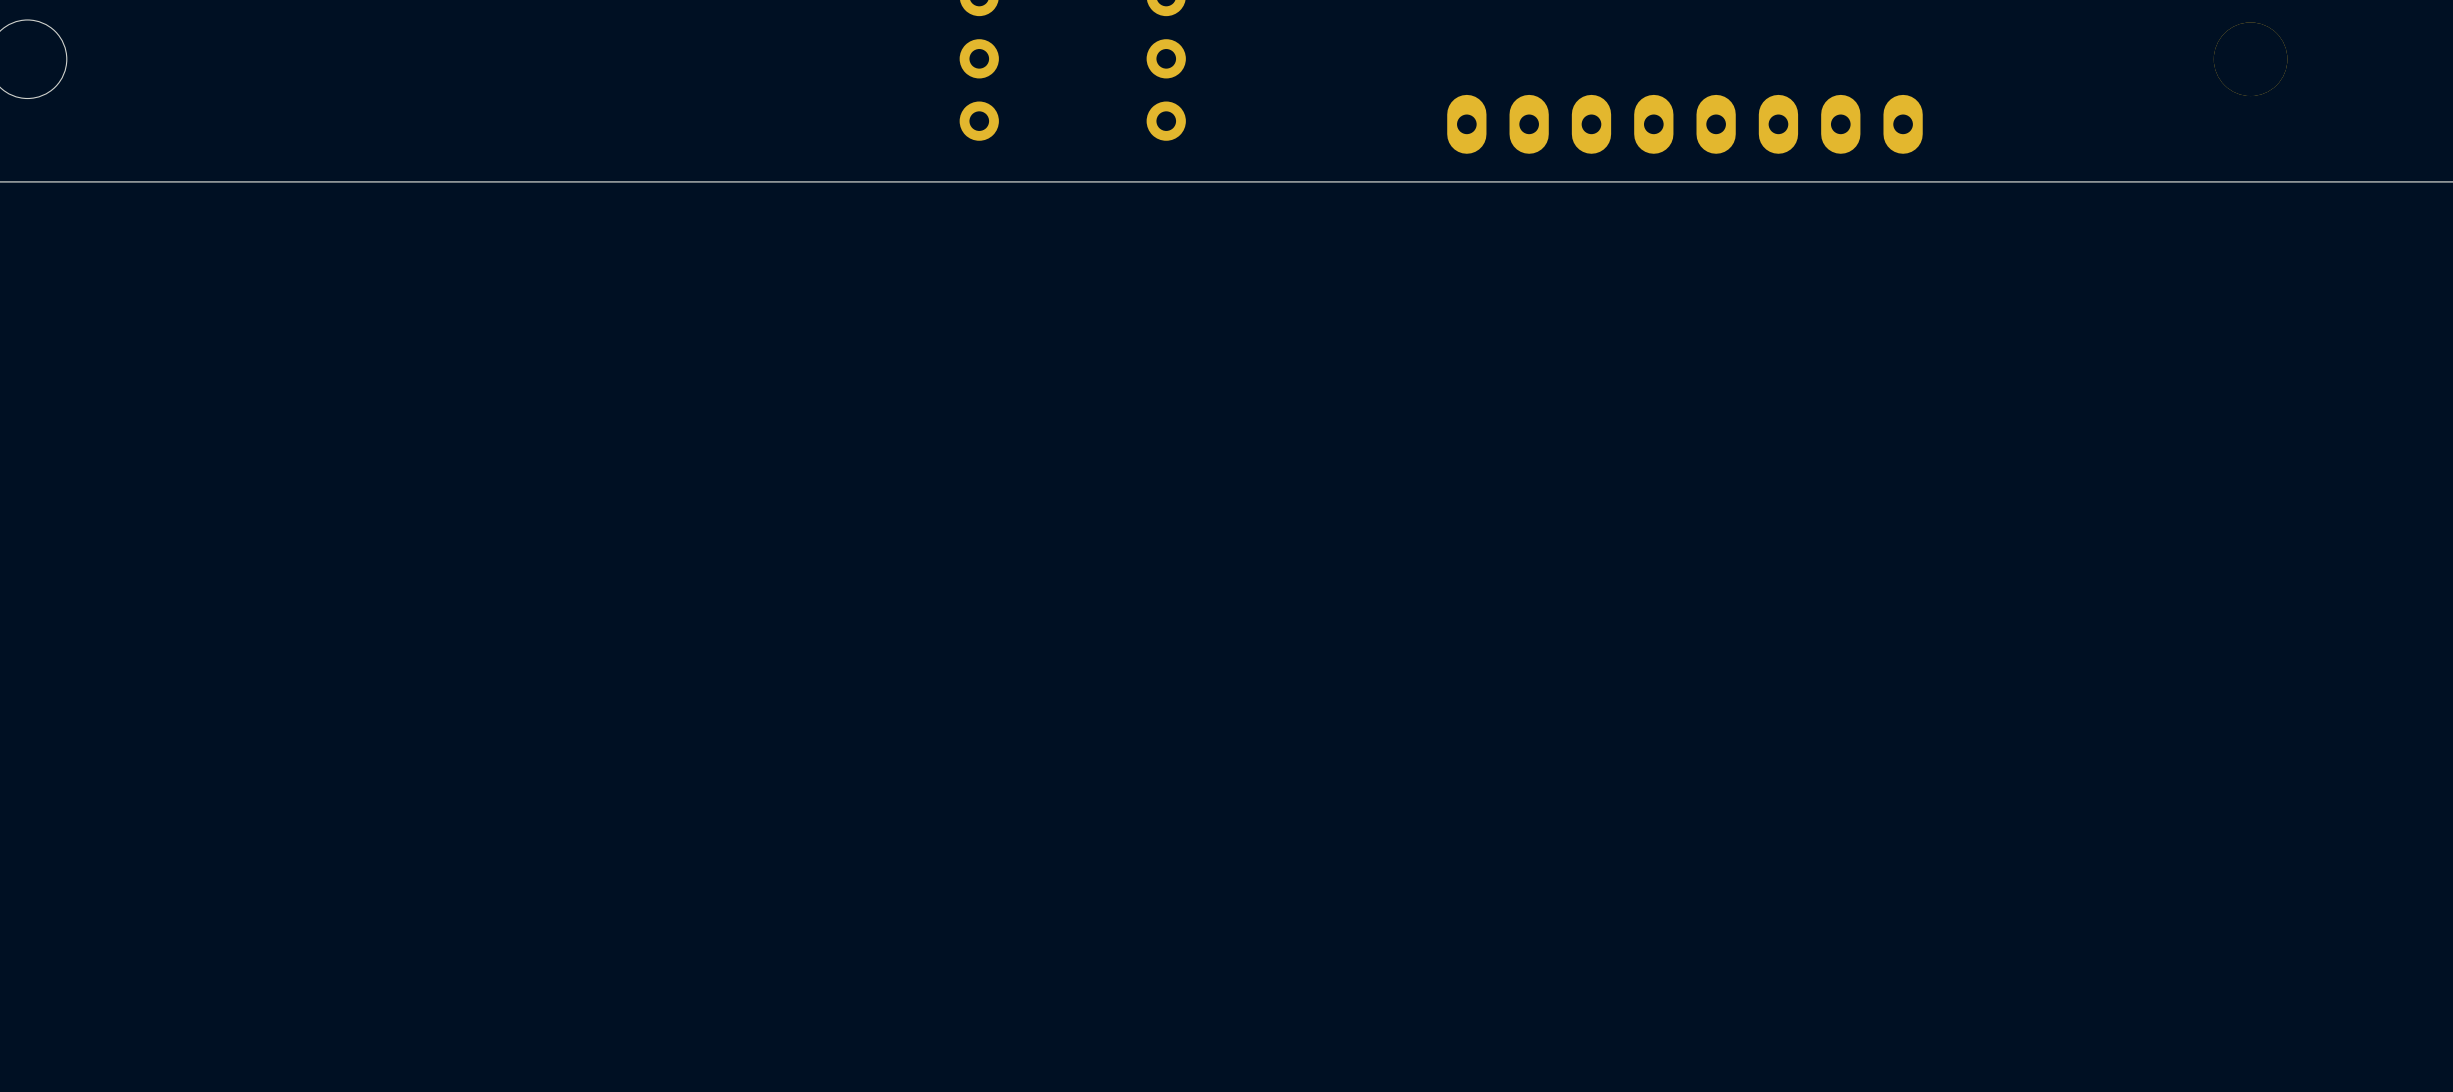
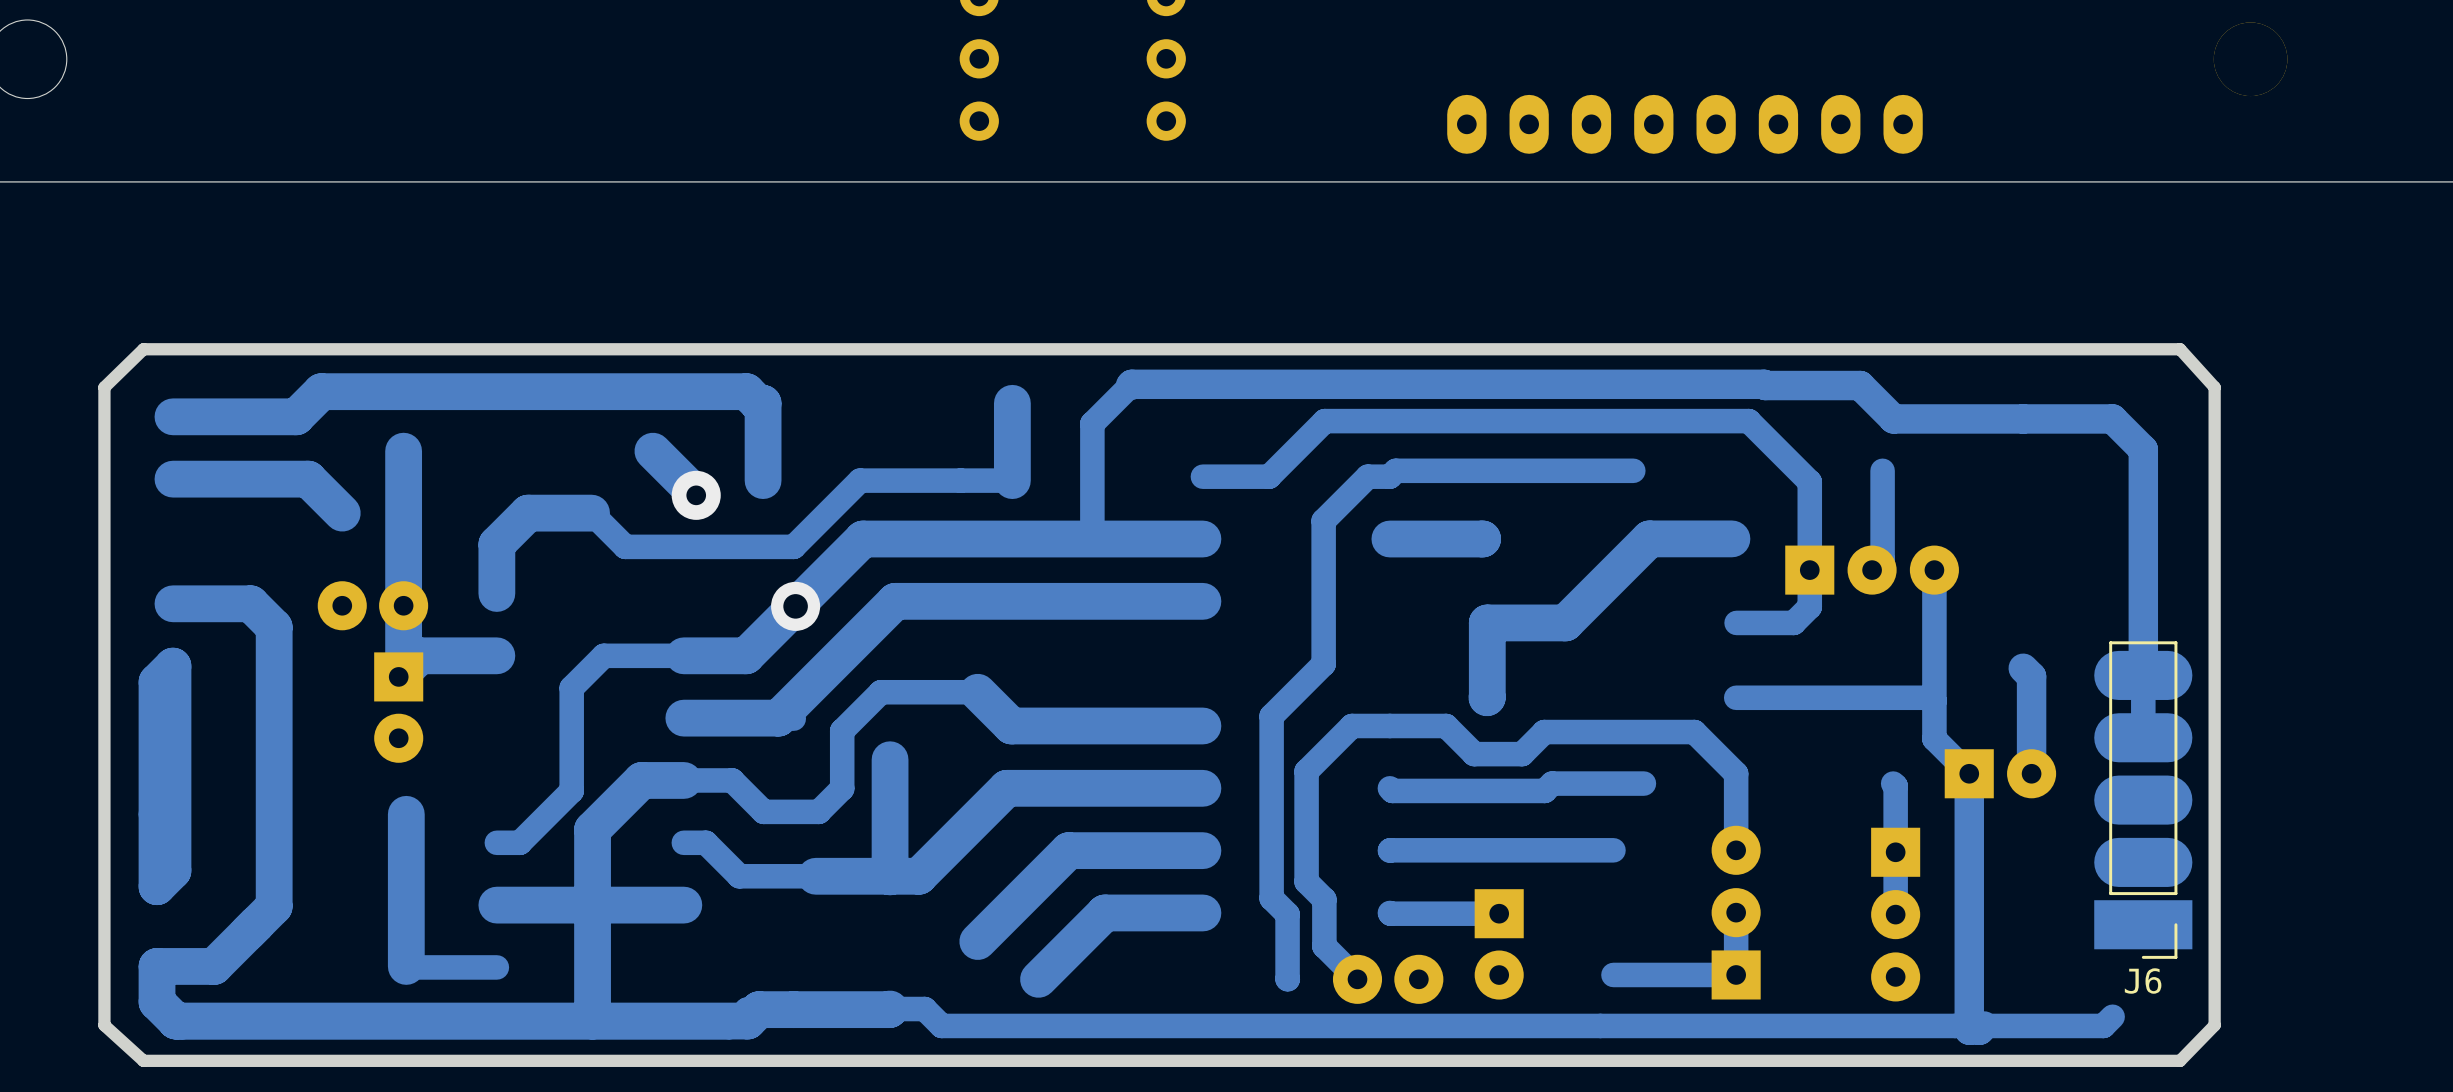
board edge: none -> (2180, 349) (2214, 387) (2214, 1025) (2180, 1060) (143, 1060) (104, 1025) (104, 387) (143, 349) (2180, 349)
track: none -> (693, 391) (321, 391) (295, 416) (172, 416) (296, 416) (321, 391) (746, 391) (758, 403) (763, 403) (763, 480)
track: none -> (1012, 403) (1012, 480) (860, 480) (793, 546) (625, 546) (591, 513) (528, 513) (496, 544) (496, 593)
track: none -> (403, 451) (403, 672) (403, 451)
track: none -> (652, 451) (696, 495)
track: none -> (1633, 470) (1395, 470) (1389, 476) (1367, 476) (1323, 520) (1323, 664) (1271, 716) (1271, 898) (1287, 914) (1287, 979)
track: none -> (1882, 470) (1882, 559) (1872, 570)
track: none -> (1202, 476) (1269, 476) (1324, 421) (1748, 421) (1809, 482) (1809, 606) (1793, 622) (1736, 622)
track: none -> (172, 479) (308, 479) (342, 513)
via: none -> (696, 495)
track: none -> (1731, 538) (1649, 538) (1565, 622) (1487, 622) (1486, 697)
track: none -> (1092, 539) (1092, 423) (1131, 384) (1860, 385) (1893, 418) (2112, 418) (2143, 449) (2143, 737)
track: none -> (1202, 539) (862, 539) (746, 655) (603, 655) (571, 687) (571, 791) (519, 842) (496, 842)
track: none -> (1482, 539) (1389, 539)
part: none -> (1872, 570)
track: none -> (1934, 570) (1934, 738) (1961, 765)
track: none -> (1202, 601) (895, 601) (778, 718) (683, 718) (793, 718)
track: none -> (172, 603) (250, 603) (274, 627) (274, 906) (214, 966)
part: none -> (372, 605)
via: none -> (795, 606)
track: none -> (496, 655) (419, 655) (398, 676)
track: none -> (172, 666) (172, 870) (157, 886) (157, 682) (172, 666)
track: none -> (2023, 668) (2031, 676) (2031, 773)
track: none -> (1736, 697) (1931, 697) (1934, 700)
part: none -> (398, 707)
track: none -> (1202, 725) (1011, 725) (977, 692) (880, 692) (842, 730) (842, 788) (818, 811) (763, 811) (732, 780) (641, 780) (592, 829) (592, 1021)
track: none -> (890, 759) (890, 876)
track: none -> (1969, 773) (1969, 1030) (1979, 1030) (1983, 1025)
part: none -> (2000, 773)
track: none -> (1643, 783) (1552, 783) (1544, 790) (1392, 790) (1389, 788)
track: none -> (1893, 783) (1895, 786) (1895, 914)
track: none -> (1202, 788) (1006, 788) (918, 876) (739, 876) (705, 842) (683, 842)
J6: none -> (2143, 800)
track: none -> (406, 814) (406, 966) (496, 967)
track: none -> (1202, 850) (1068, 850) (977, 941)
track: none -> (1613, 850) (1390, 850)
track: none -> (1736, 850) (1736, 773) (1694, 732) (1544, 732) (1522, 754) (1474, 754) (1446, 725) (1351, 725) (1306, 771) (1306, 881) (1324, 899) (1324, 946) (1357, 979)
track: none -> (683, 905) (496, 905) (683, 905)
track: none -> (1202, 912) (1104, 912) (1038, 979)
track: none -> (1389, 912) (1499, 913)
track: none -> (1736, 912) (1736, 974) (1613, 974)
part: none -> (1736, 912)
part: none -> (1895, 914)
part: none -> (1499, 944)
track: none -> (214, 966) (157, 966) (157, 1002)
part: none -> (1388, 979)
track: none -> (157, 1002) (176, 1021) (747, 1021) (759, 1009) (890, 1009) (924, 1009) (941, 1025) (2103, 1025) (2112, 1016)

